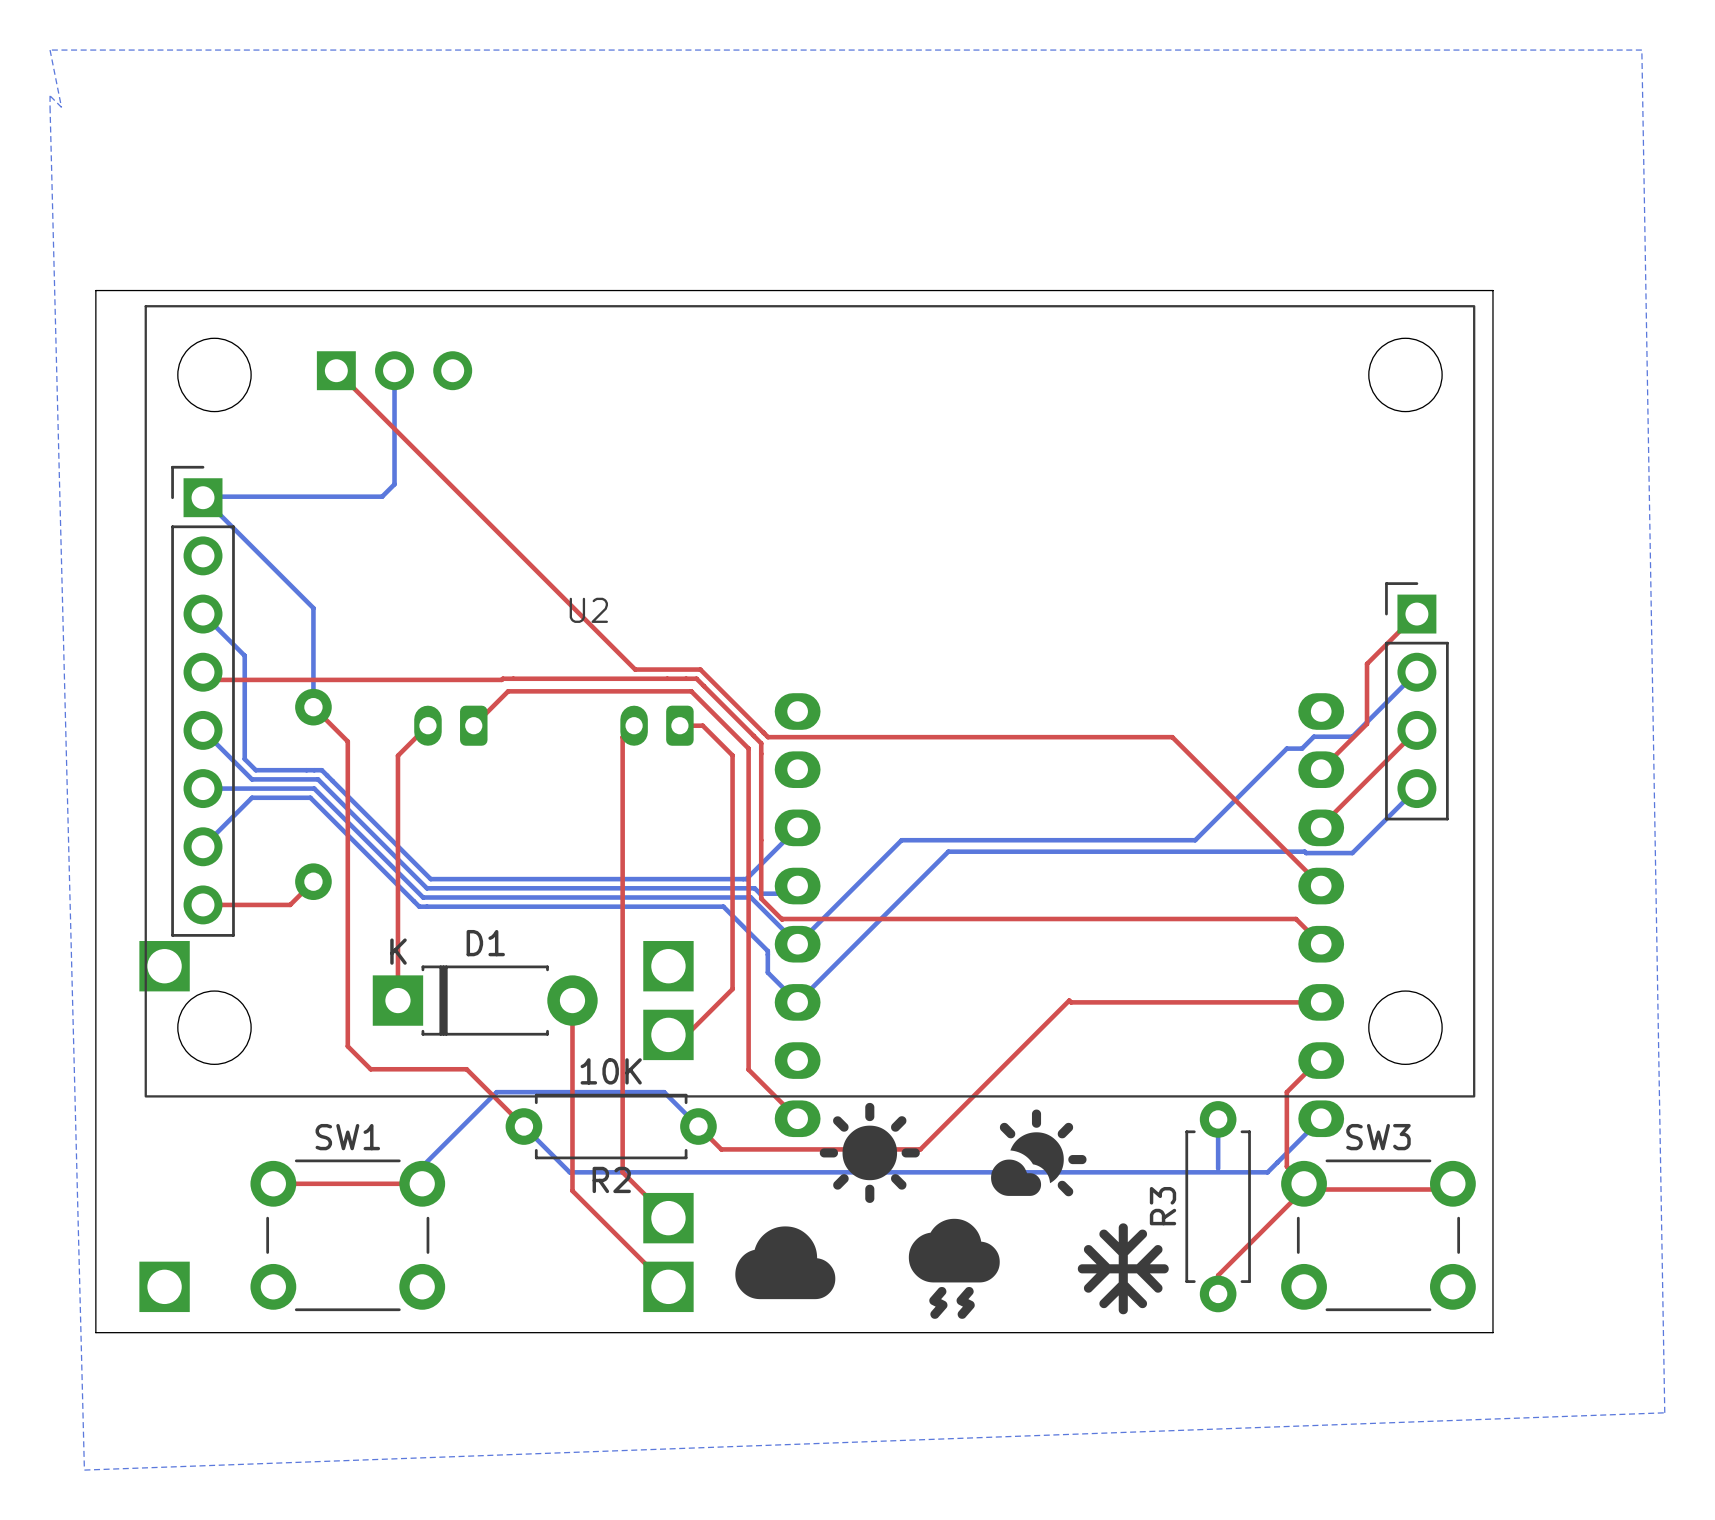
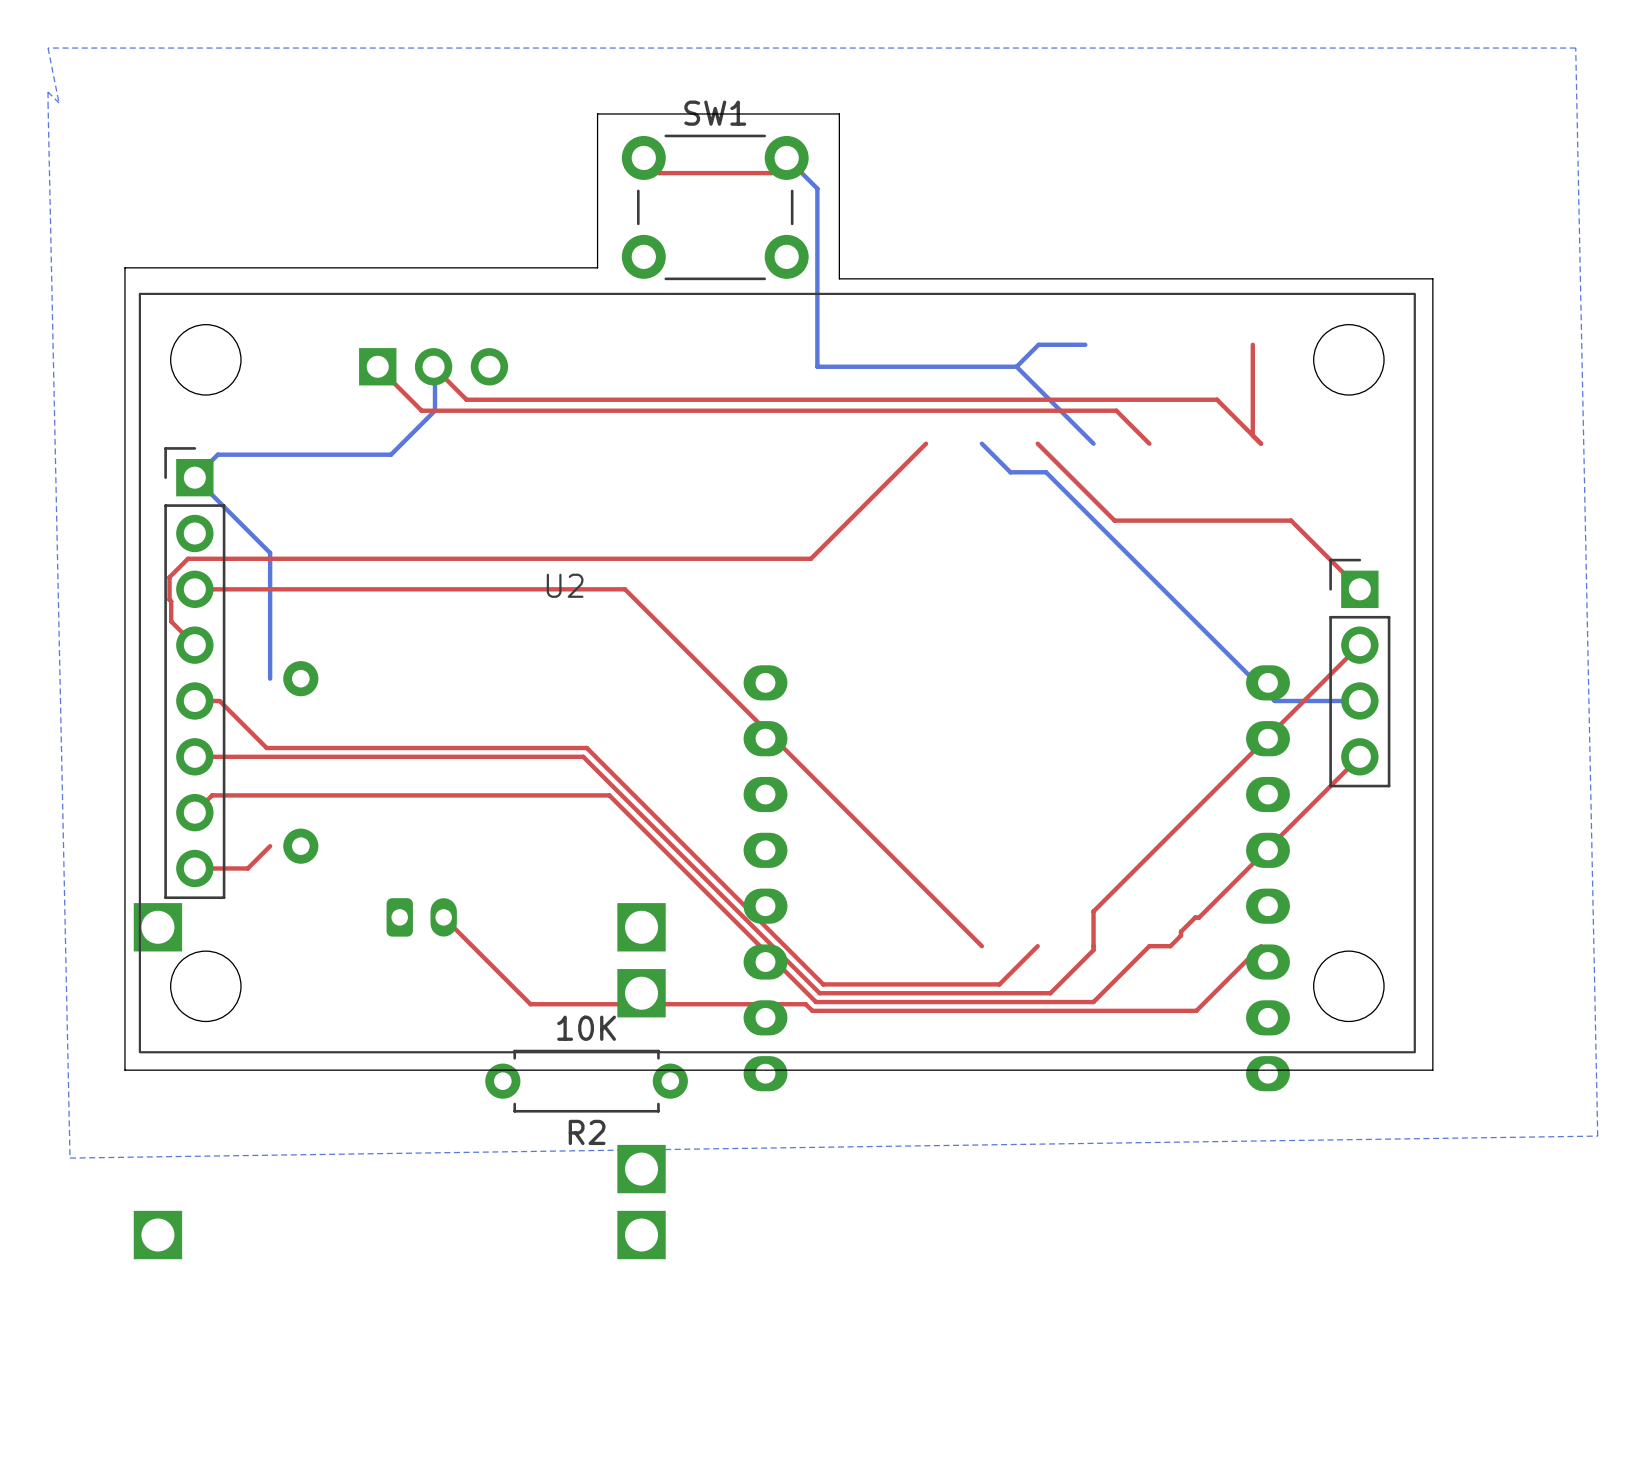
bottom zone outline: (1641, 50) (1664, 1412) (84, 1470) (50, 107) -> (1575, 48) (1597, 1136) (70, 1158) (48, 102)
top track: none -> (643, 157) (658, 173) (771, 173) (786, 157) (801, 173)
bottom track: none -> (786, 157) (817, 188) (817, 366) (1016, 366)
board edge: (874, 290) (95, 290) (95, 1332) (1492, 1332) (1492, 1115) -> (839, 278) (839, 113) (597, 113) (597, 267) (124, 267) (124, 1070) (1432, 1070)
bottom track: none -> (1085, 344) (1038, 344) (1016, 366)
top track: none -> (1252, 344) (1252, 435)
top track: (336, 370) (635, 669) (700, 669) (768, 737) (1172, 737) (1321, 886) -> none
bottom track: (394, 370) (394, 484) (382, 496) (204, 496) -> (434, 366) (434, 410) (391, 454) (217, 454) (195, 476)
part position: (394, 370) -> (433, 366)
top track: none -> (377, 366) (421, 410) (1116, 410) (1149, 443)
top track: none -> (433, 366) (466, 399) (1217, 399) (1261, 443)
bottom track: none -> (1016, 366) (1093, 443)
bottom track: none -> (981, 443) (1010, 472) (1046, 472) (1274, 700) (1359, 700)
bottom track: (281, 576) (313, 608) (313, 707) -> (270, 552) (270, 678)
top track: none -> (194, 589) (625, 589) (981, 946)
bottom track: (203, 614) (244, 655) (244, 759) (255, 770) (321, 770) (430, 879) (746, 879) (797, 827) -> none
top track: (1416, 614) (1367, 663) (1367, 723) (1321, 769) -> (1359, 589) (1291, 520) (1114, 520) (1037, 443)
top track: (203, 672) (210, 679) (696, 678) (761, 743) (761, 898) (782, 919) (1295, 918) (1321, 944) -> (194, 645) (171, 621) (169, 577) (188, 558) (810, 558) (926, 443)
top track: none -> (1359, 645) (1093, 911) (1093, 950) (1050, 993) (819, 993) (583, 756) (194, 756)
bottom track: (1416, 672) (1352, 736) (1313, 736) (1302, 748) (1286, 748) (1195, 840) (901, 840) (797, 944) (750, 897) (423, 897) (314, 788) (203, 788) -> none
top track: (313, 707) (347, 741) (347, 1046) (370, 1069) (466, 1069) (523, 1126) -> none
top track: (427, 725) (397, 755) (397, 1000) -> none
part: (450, 725) -> none
top track: (473, 725) (508, 691) (691, 691) (748, 748) (748, 1069) (797, 1118) -> none
top track: (634, 725) (622, 737) (622, 1172) (668, 1218) -> none
part: (657, 725) -> none
top track: (679, 725) (702, 725) (732, 755) (732, 989) (686, 1034) (668, 1034) -> none
top track: none -> (194, 700) (219, 700) (266, 748) (586, 748) (823, 984) (999, 984) (1037, 946)
bottom track: (203, 730) (252, 779) (318, 779) (426, 888) (754, 888) (760, 893) (789, 893) (797, 886) -> none
top track: (1416, 730) (1321, 827) -> none
top track: none -> (1359, 756) (1199, 917) (1195, 917) (1170, 946) (1149, 946) (1093, 1002) (816, 1002) (609, 795) (212, 795) (194, 812)
bottom track: (1416, 788) (1352, 853) (948, 851) (797, 1002) (767, 972) (767, 951) (723, 906) (419, 906) (310, 797) (252, 797) (203, 846) -> none
top track: (313, 881) (290, 904) (258, 904) -> (270, 846) (247, 868)
part: none -> (421, 917)
top track: none -> (443, 917) (530, 1004) (805, 1004) (812, 1010) (1196, 1010) (1261, 946)
D1: (485, 1000) -> none
top track: (572, 1000) (572, 1190) (668, 1286) -> none
top track: (1321, 1002) (1071, 1002) (1069, 1000) (920, 1149) (721, 1149) (698, 1126) -> none
top track: (1321, 1060) (1318, 1060) (1286, 1092) (1286, 1166) (1304, 1183) -> none
drawing: [819, 1102, 920, 1203] -> none
drawing: [908, 1109, 1087, 1319] -> none
bottom track: (1321, 1118) (1267, 1172) (569, 1172) (523, 1126) -> none
bottom track: (1218, 1119) (1218, 1168) -> none
bottom track: (698, 1126) (664, 1092) (496, 1092) (422, 1166) (422, 1183) -> none
top track: (273, 1183) (422, 1183) -> none
top track: (1452, 1189) (1304, 1189) (1218, 1275) (1218, 1293) -> none
R3: (1218, 1206) -> none
drawing: [1077, 1223, 1169, 1315] -> none
drawing: [735, 1226, 836, 1300] -> none
SW1 position: (347, 1235) -> (715, 207)
SW3: (1378, 1235) -> none

